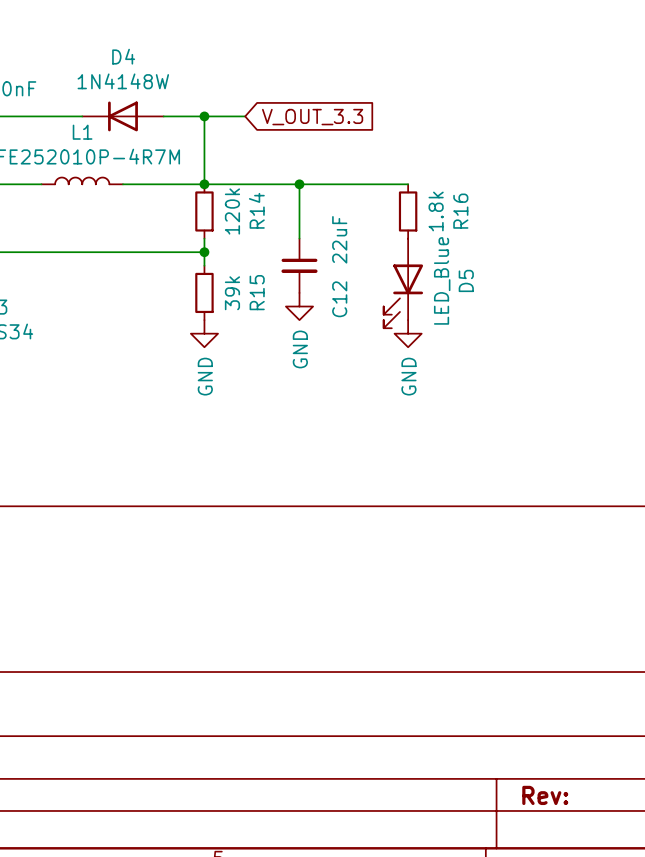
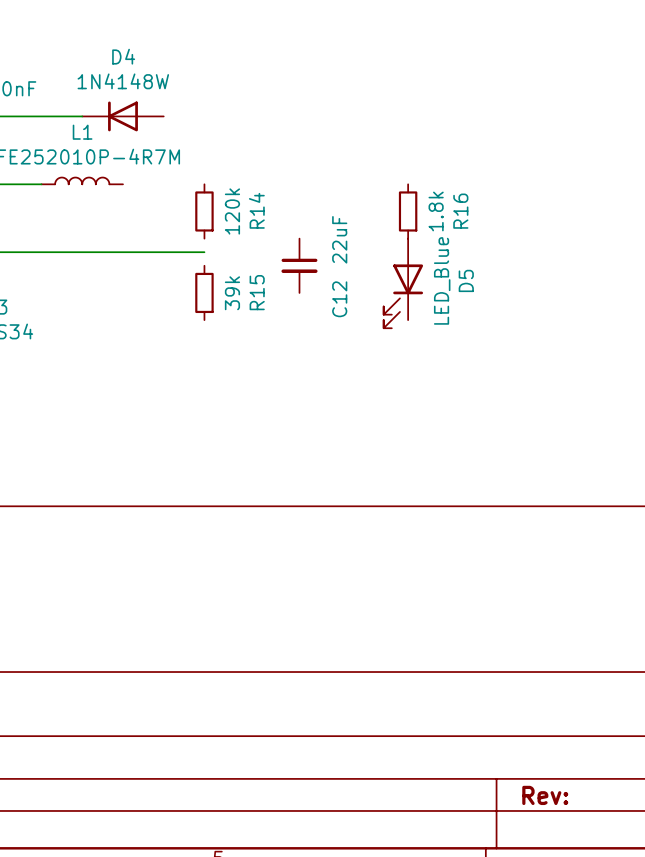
wire: (163, 116) (245, 116) -> none
wire: (204, 116) (204, 184) -> none
junction: (204, 116) -> none
global label: V_OUT_3.3 (312, 117) -> none
wire: (122, 184) (408, 184) -> none
junction: (204, 184) -> none
wire: (299, 184) (299, 238) -> none
junction: (299, 184) -> none
wire: (204, 238) (204, 265) -> none
junction: (204, 252) -> none
power symbol: GND (299, 306) -> none
power symbol: GND (204, 333) -> none
power symbol: GND (408, 333) -> none

